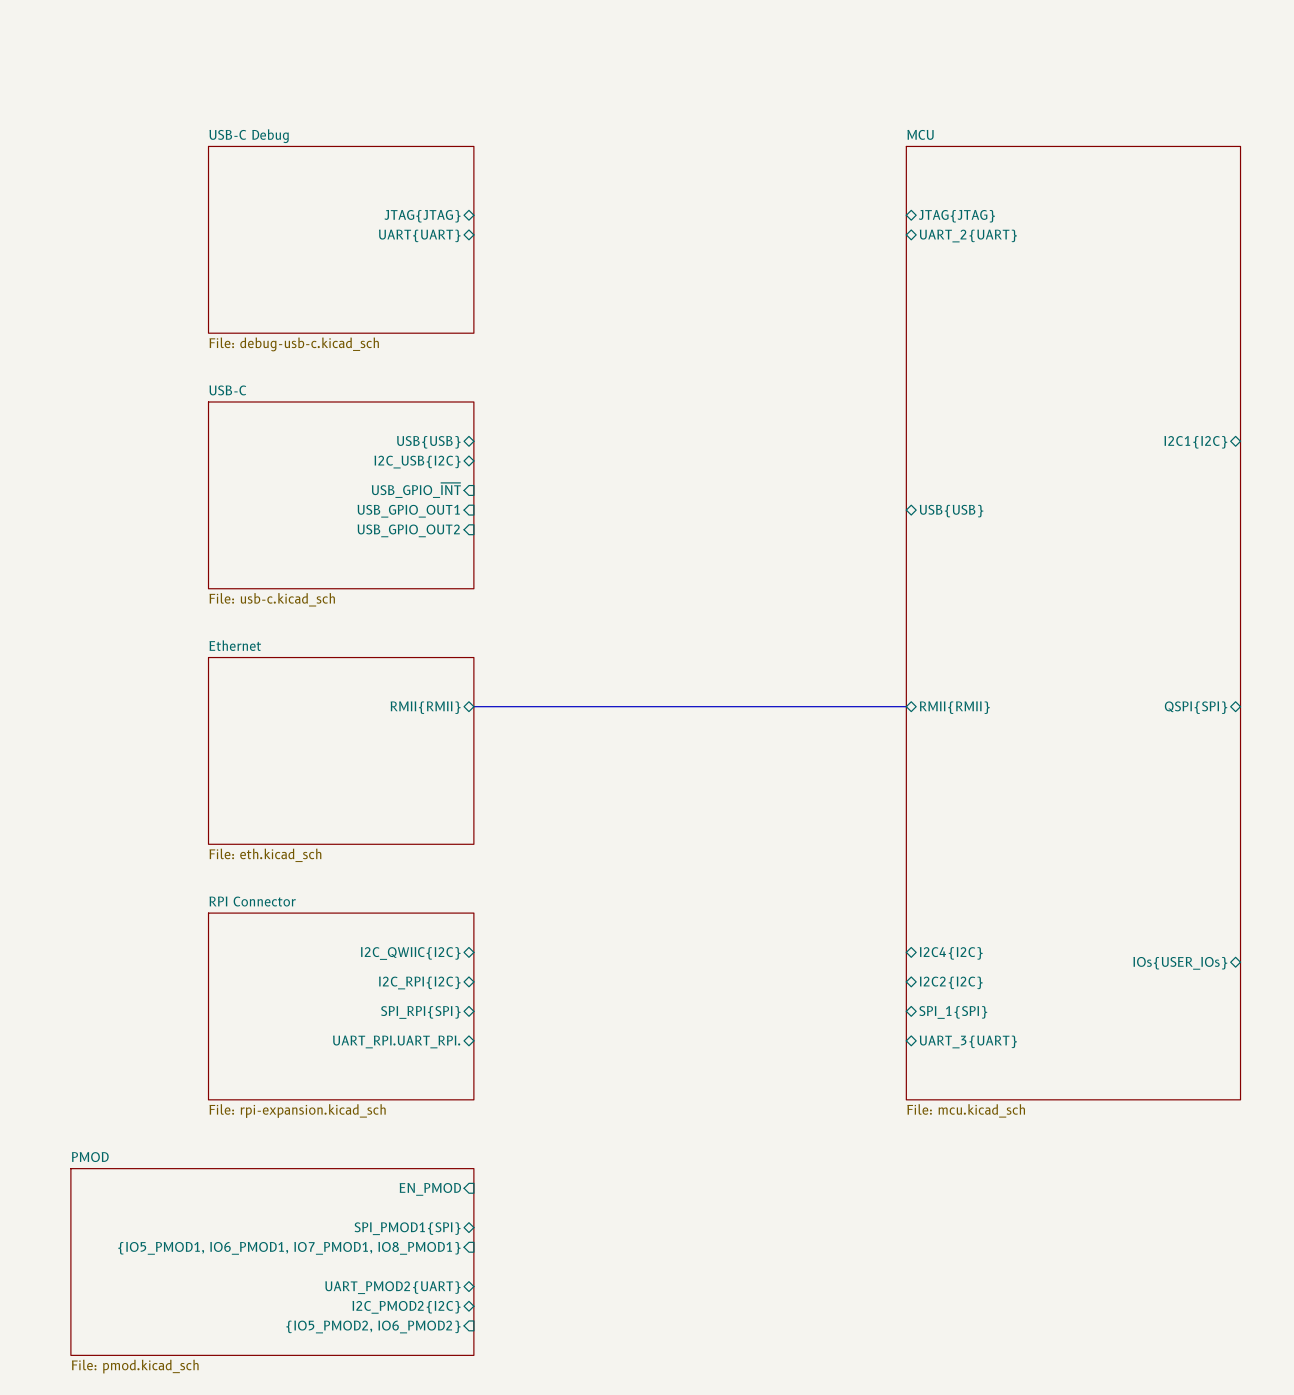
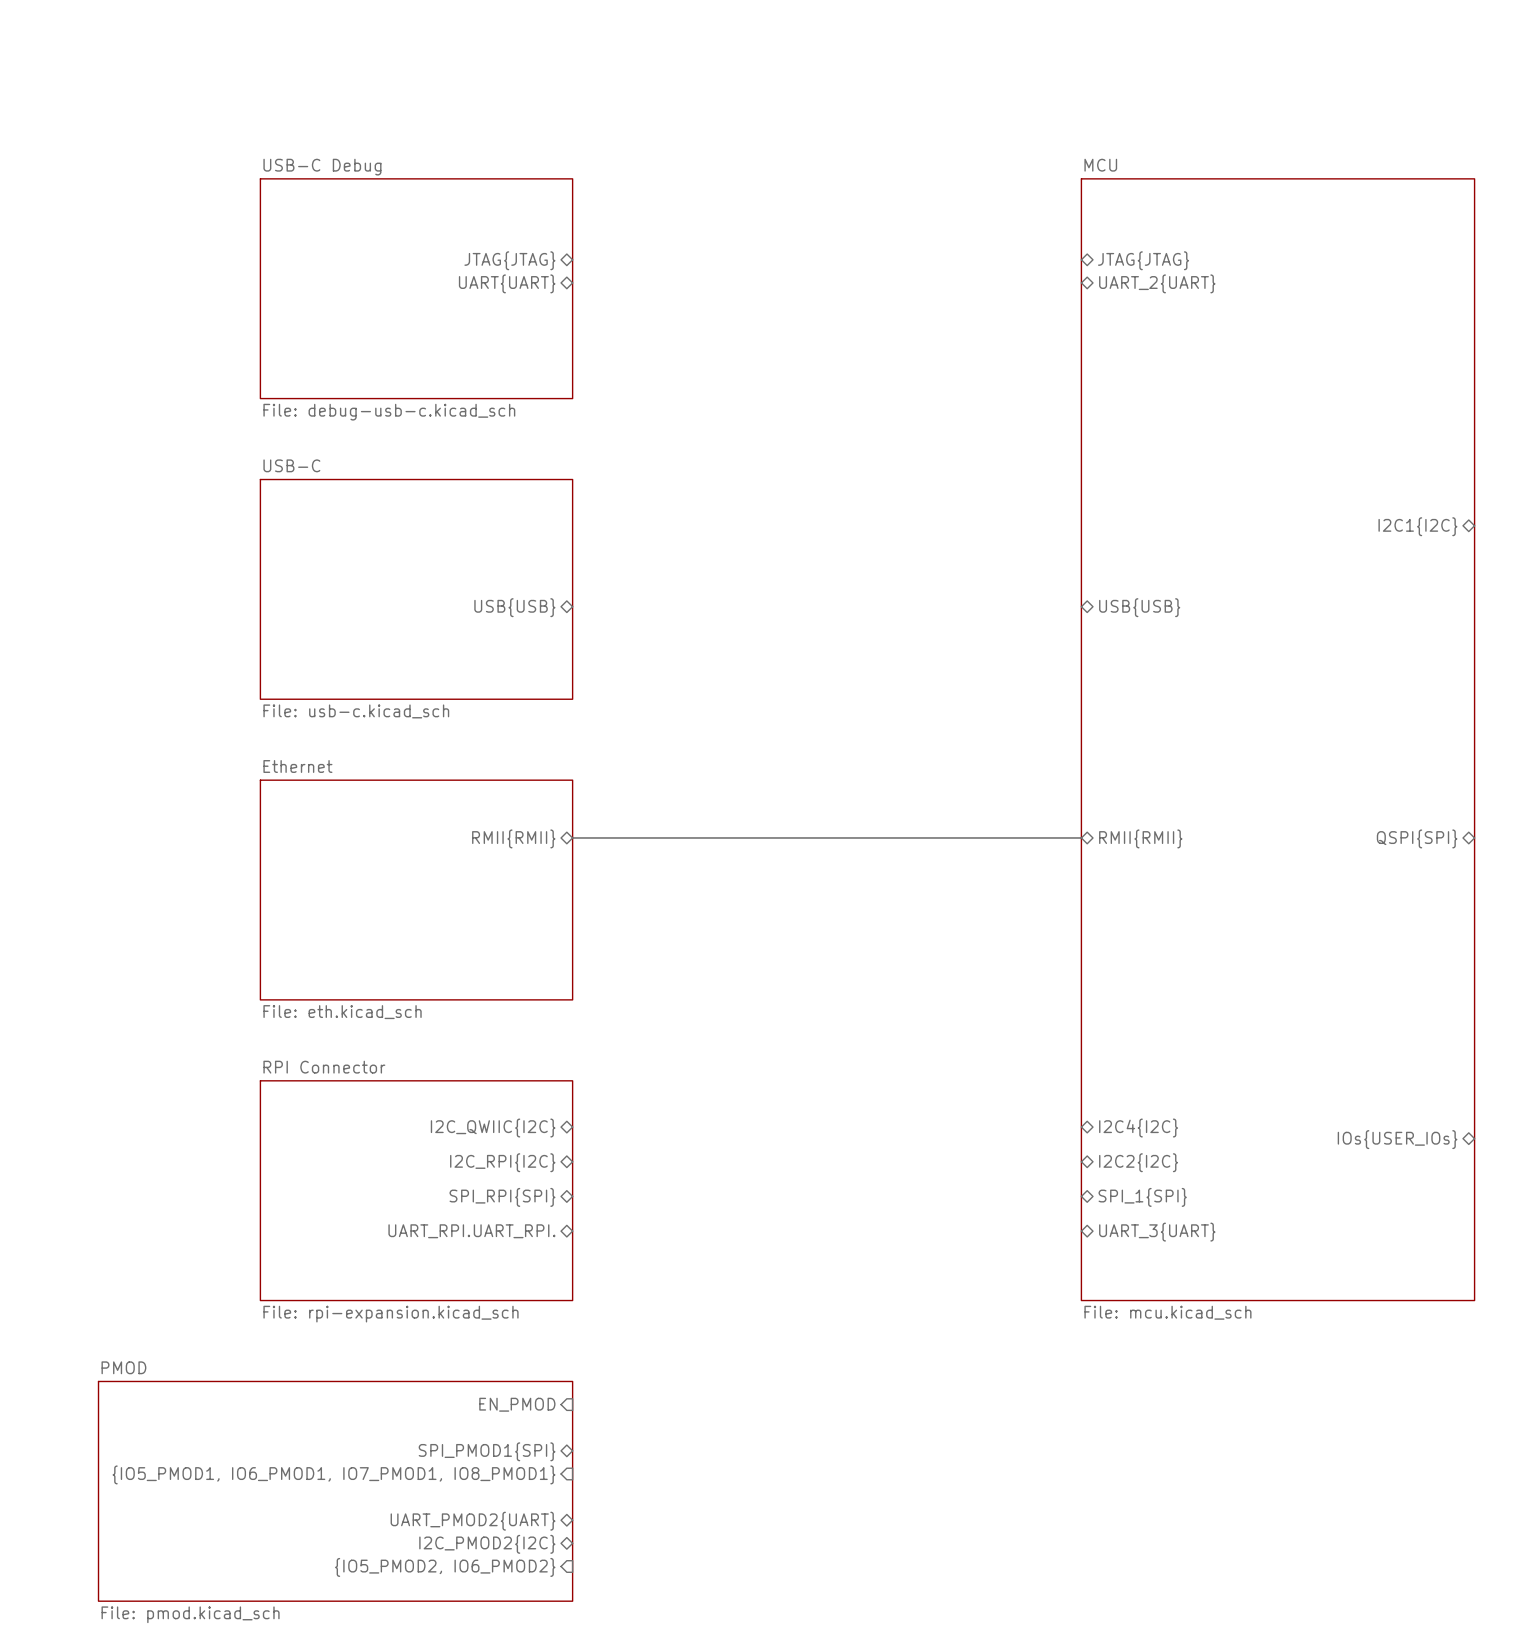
sheet pin: USB{USB} (428, 442) -> none
sheet pin: I2C_USB{I2C} (417, 462) -> none
sheet pin: USB_GPIO_~{INT} (416, 490) -> none
sheet pin shape: input (408, 511) -> bidirectional (514, 607)
sheet pin: USB_GPIO_OUT1 (408, 511) -> USB{USB} (514, 607)
sheet pin: USB_GPIO_OUT2 (408, 530) -> none

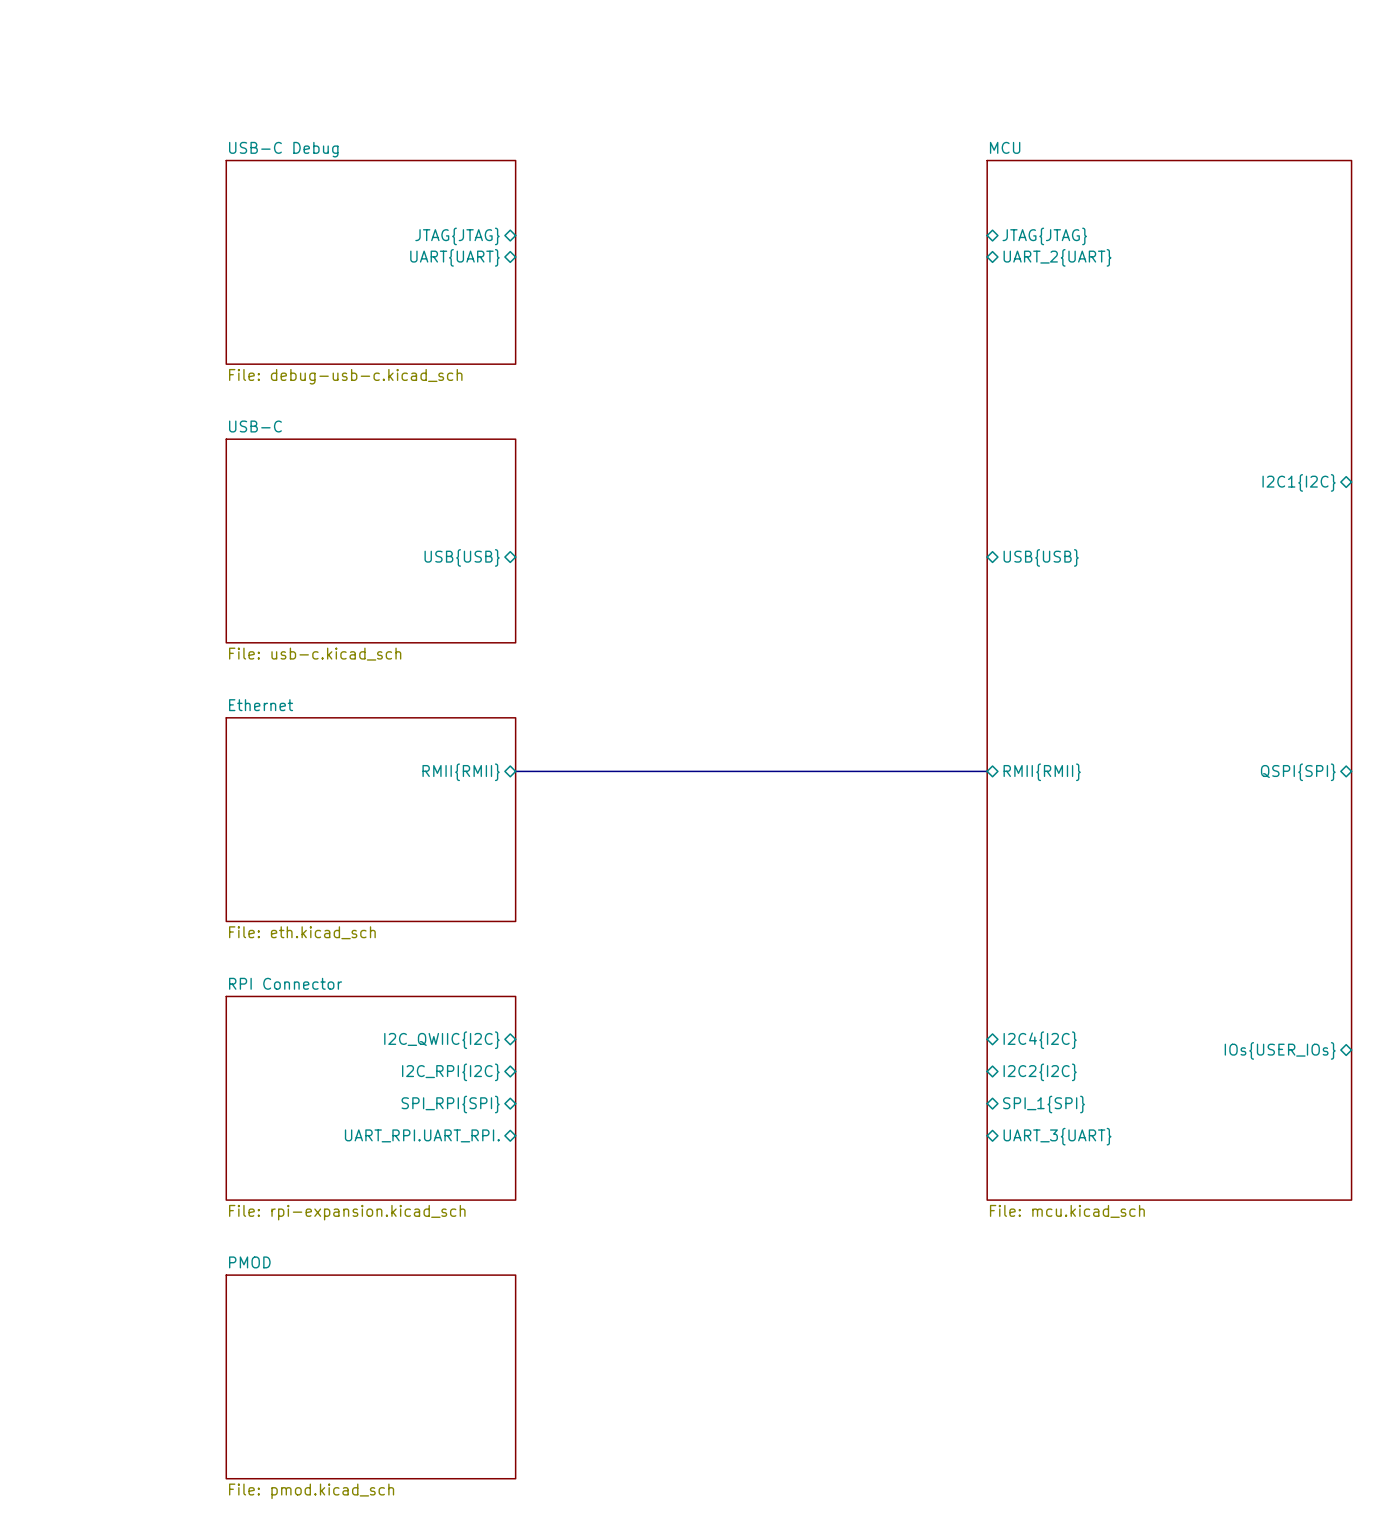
sheet pin: EN_PMOD (517, 1404) -> none
sheet pin: SPI_PMOD1{SPI} (487, 1451) -> none
sheet pin: {IO5_PMOD1, IO6_PMOD1, IO7_PMOD1, IO8_PMOD1} (334, 1474) -> none
sheet PMOD: File: pmod.kicad_sch (335, 1491) -> none
sheet PMOD: none -> File: pmod.kicad_sch (370, 1376)
sheet pin: UART_PMOD2{UART} (473, 1521) -> none
sheet pin: I2C_PMOD2{I2C} (487, 1544) -> none
sheet pin: {IO5_PMOD2, IO6_PMOD2} (445, 1567) -> none

